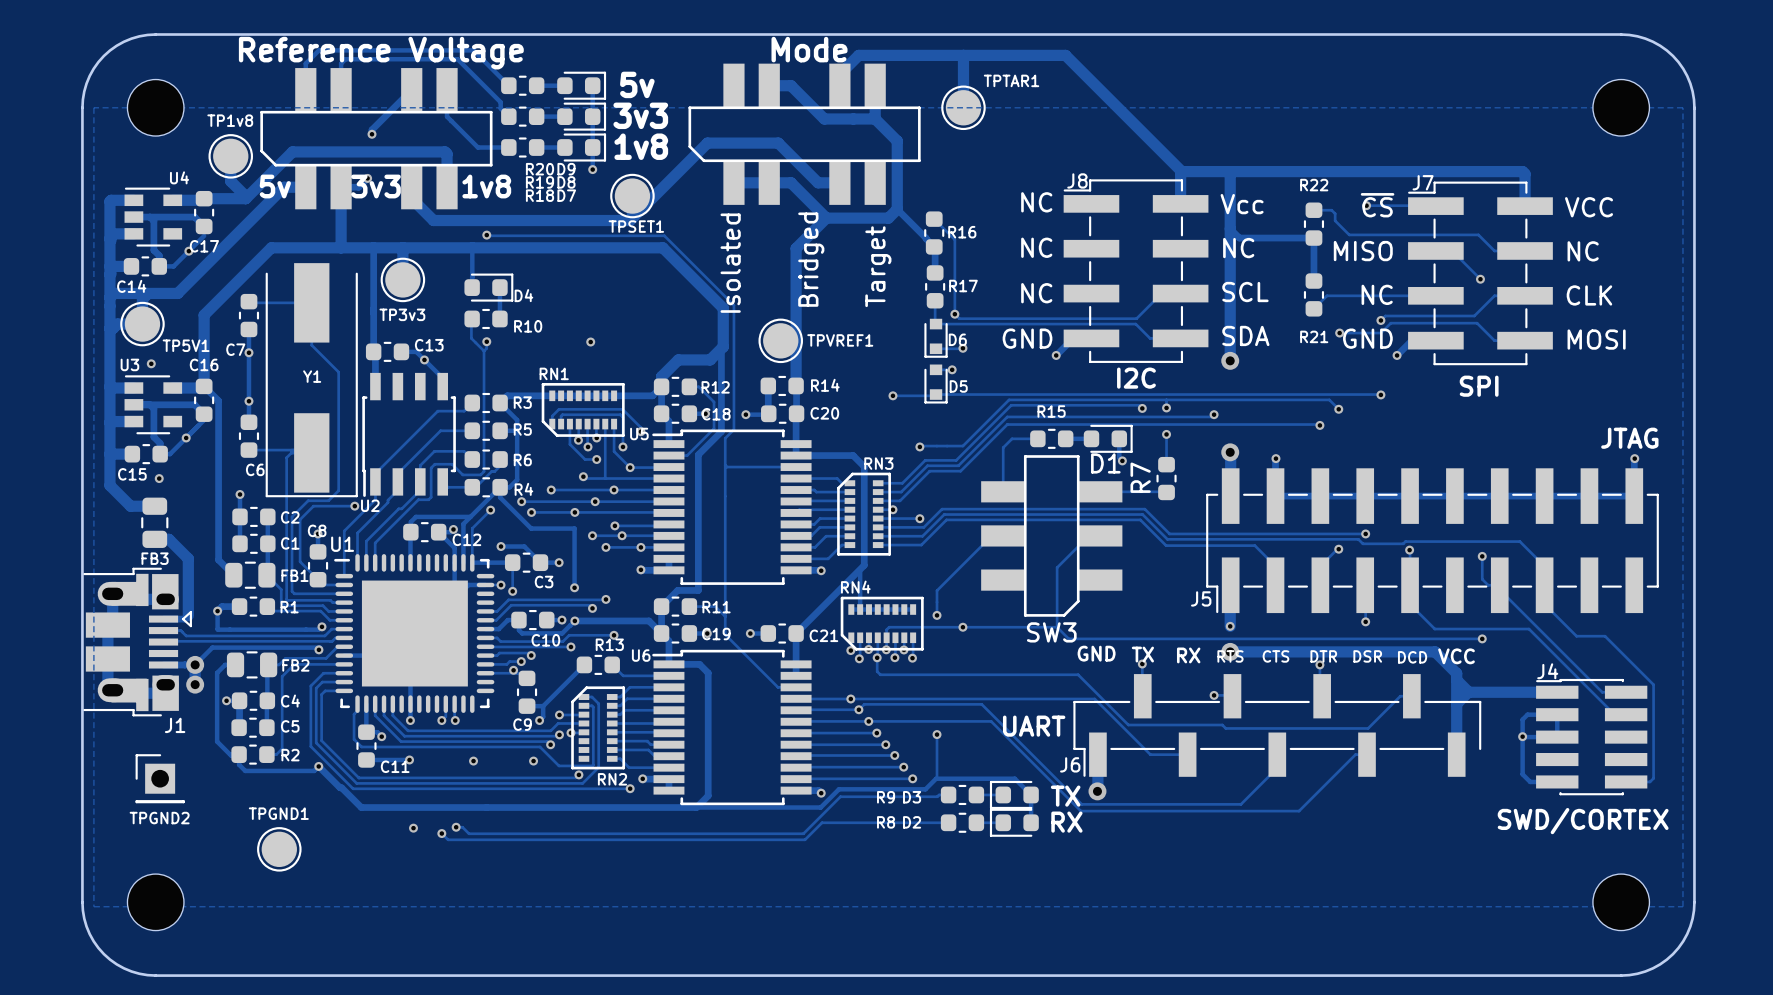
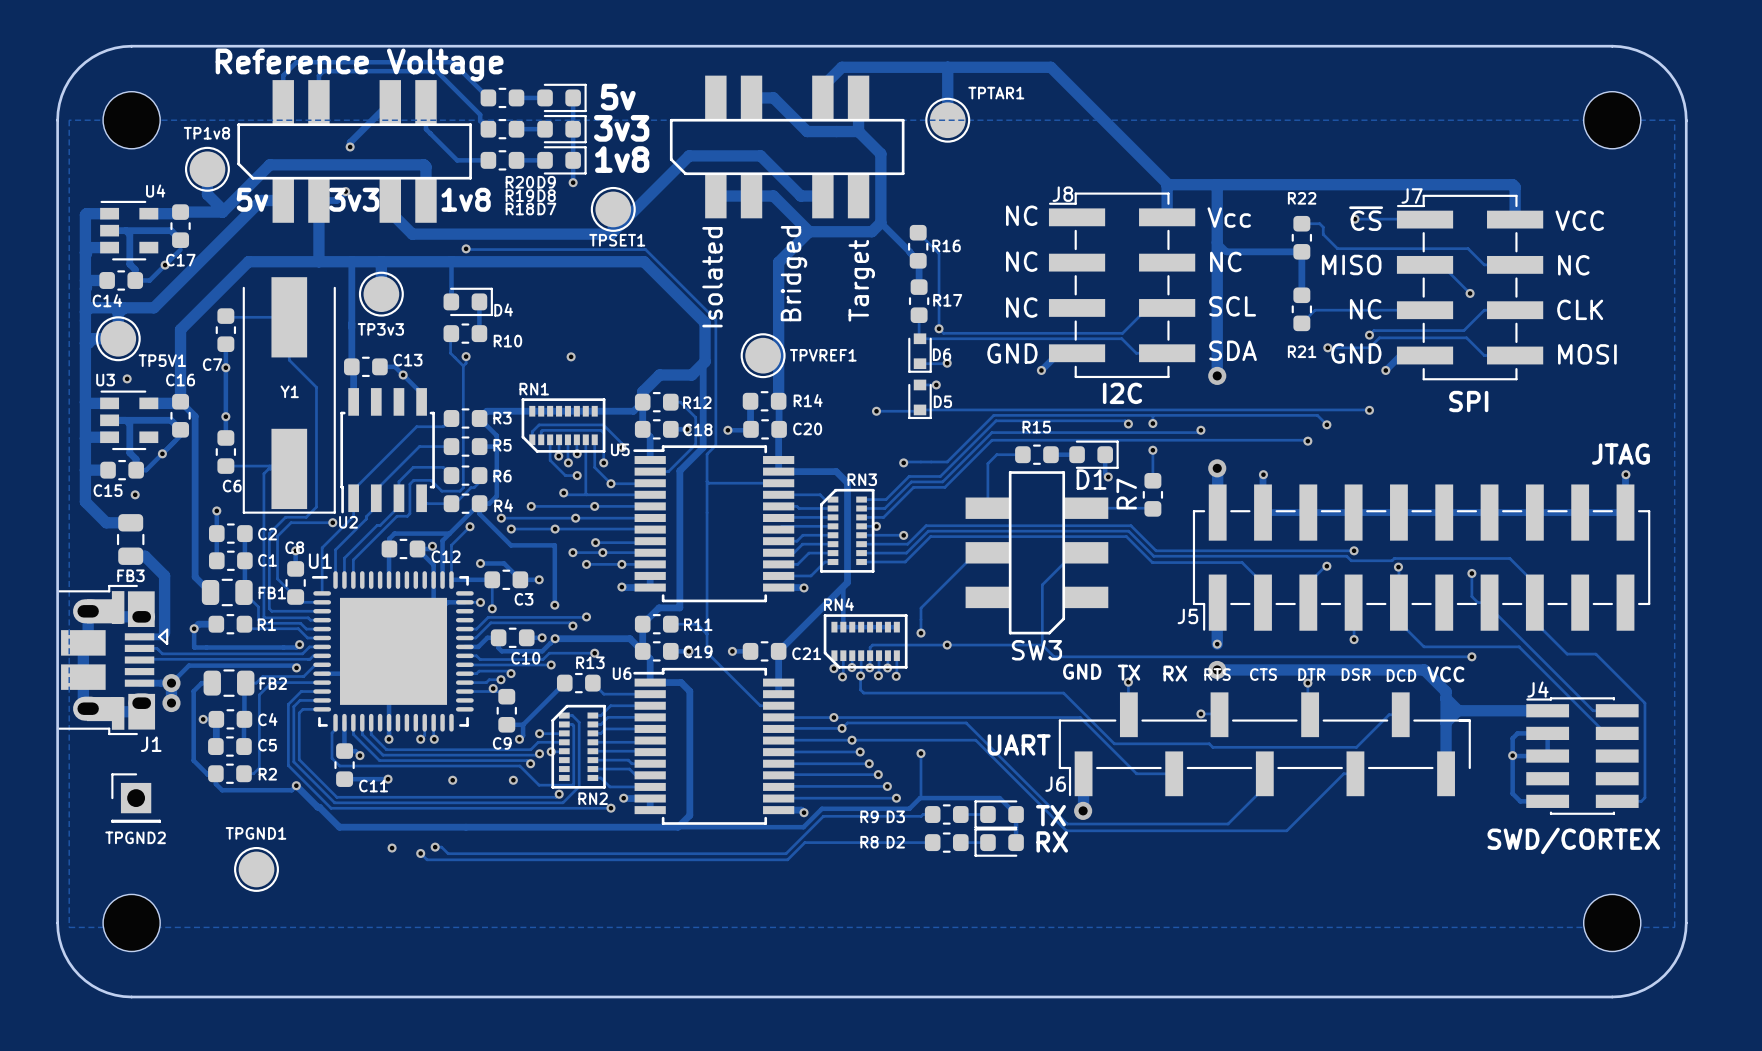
text: Mode (809, 49) -> none

